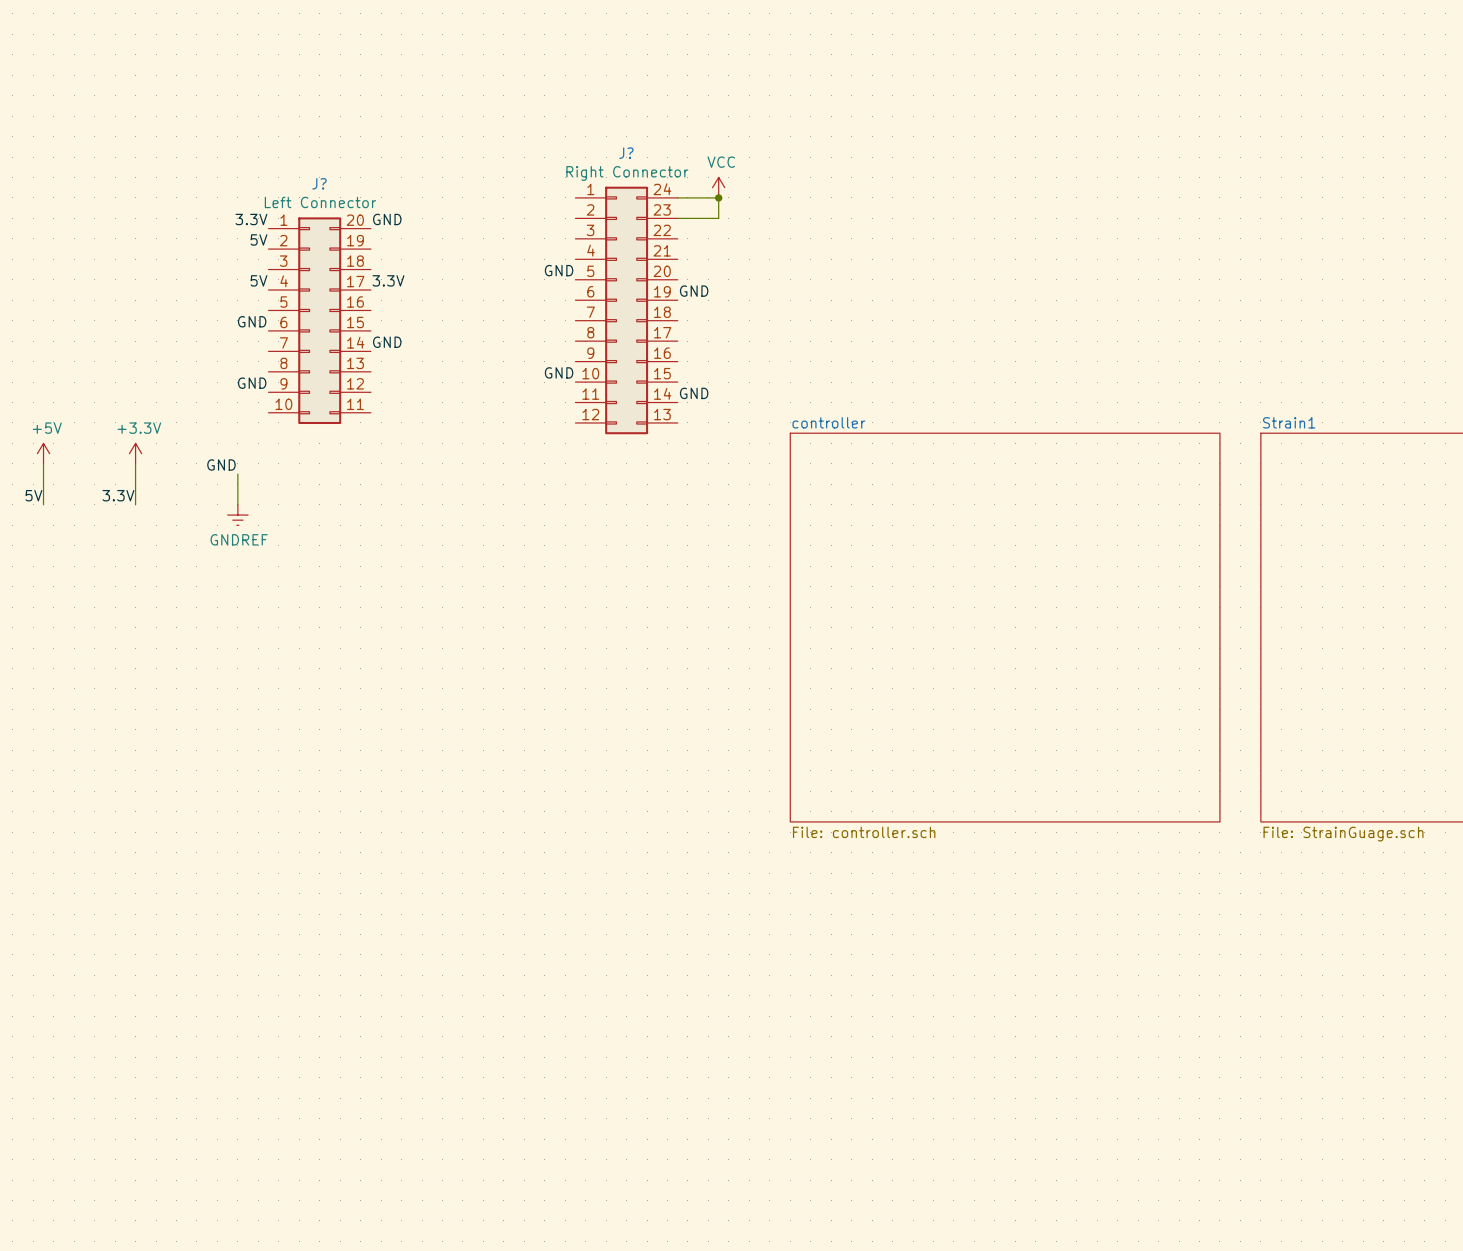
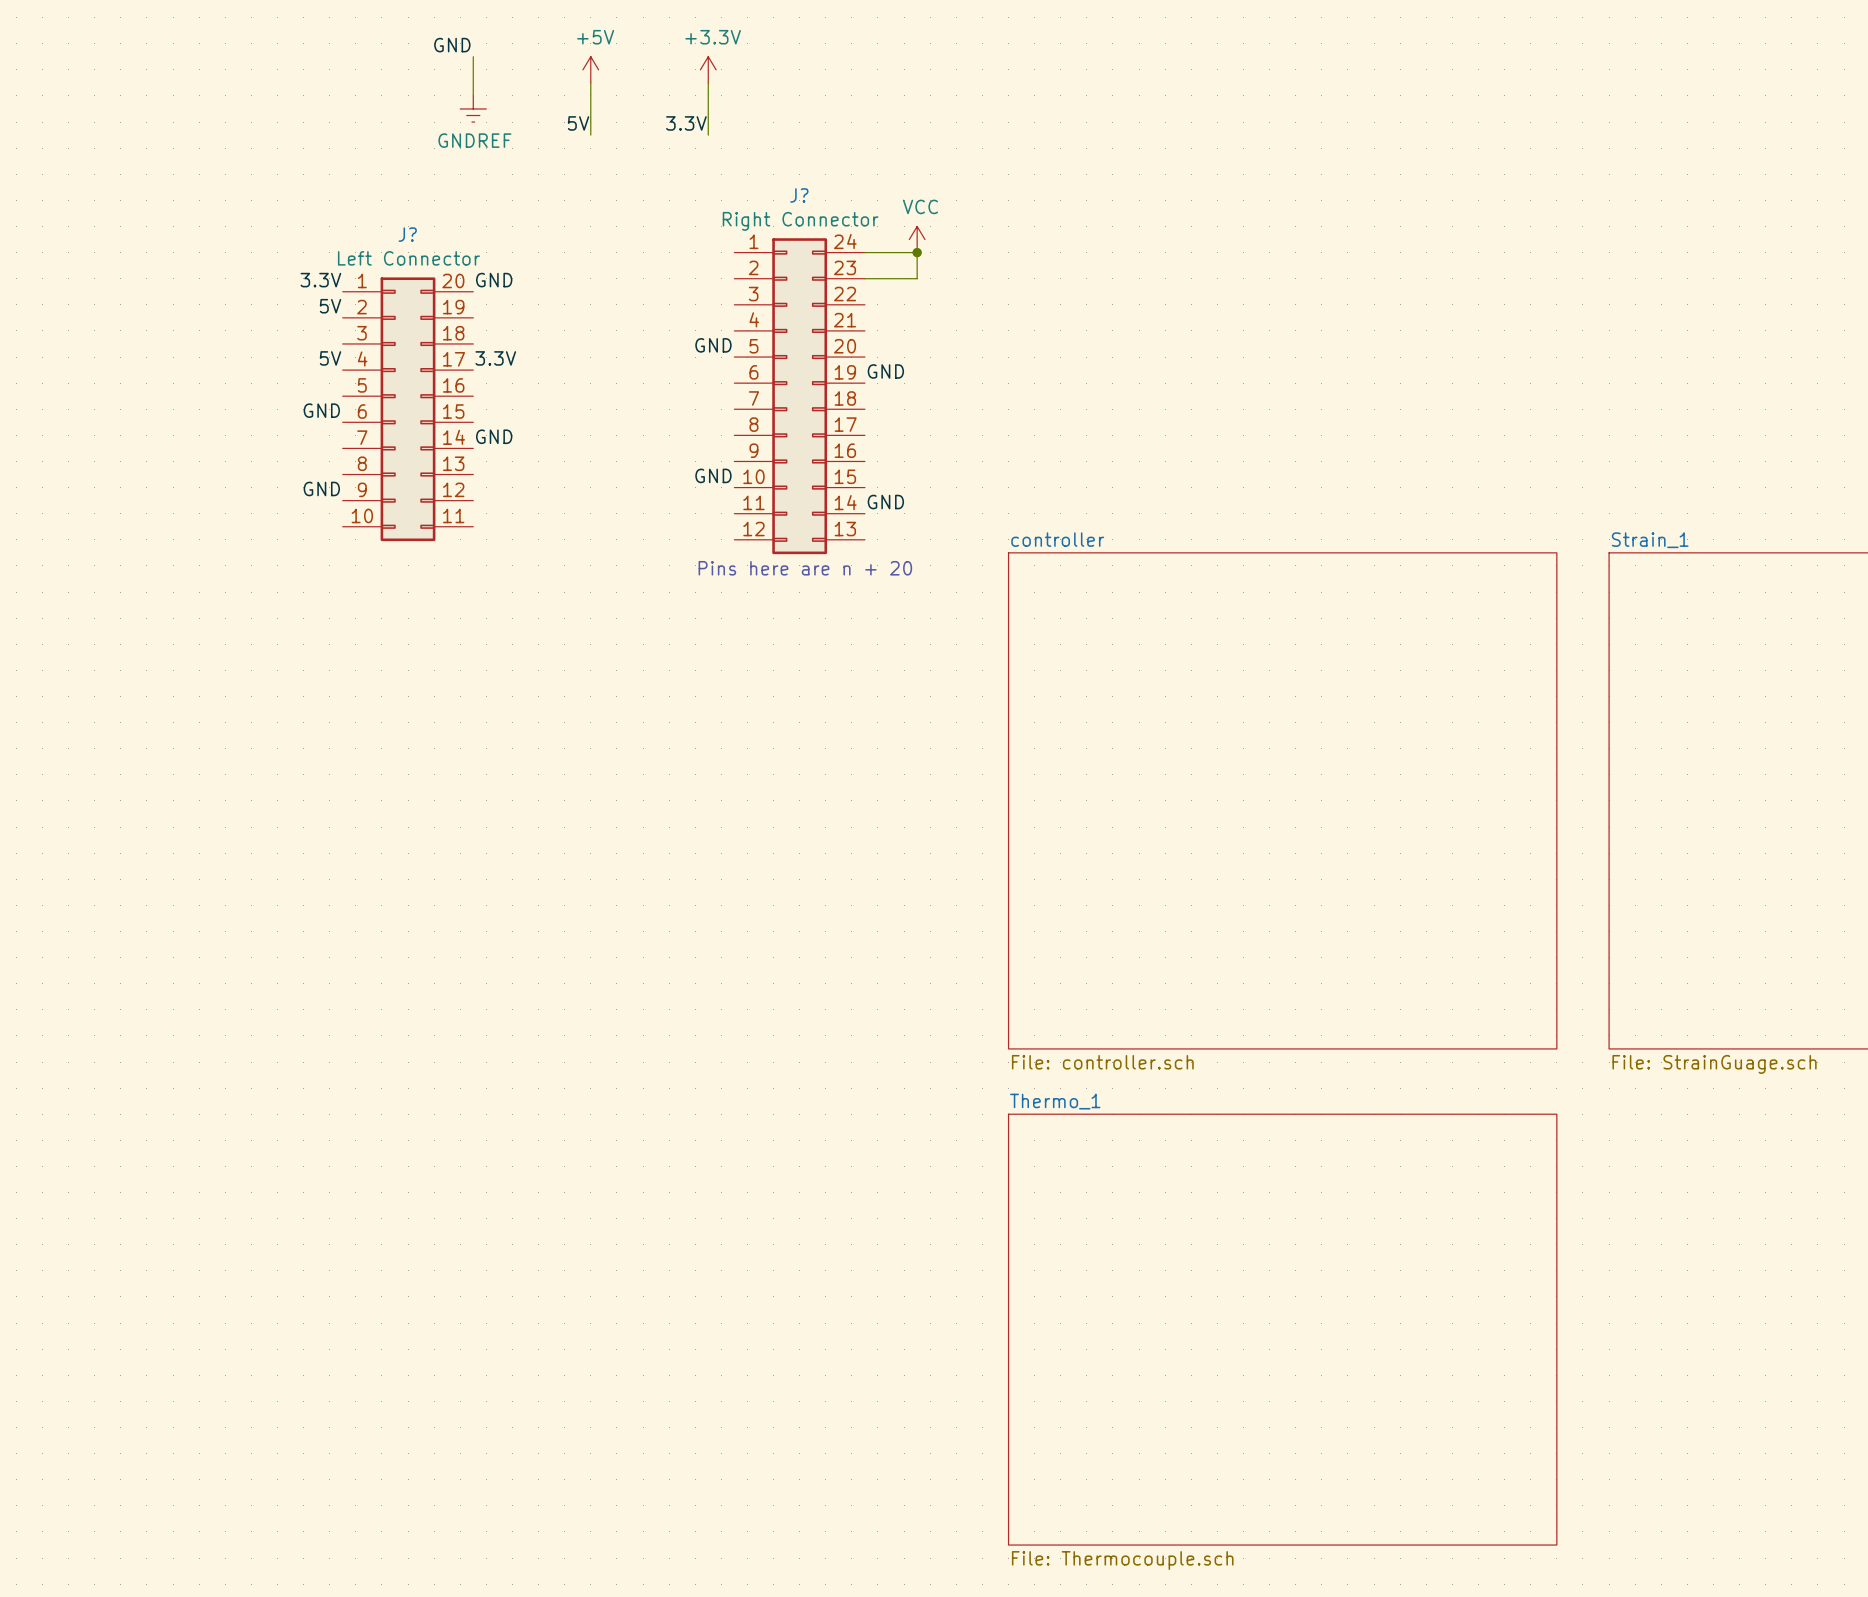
label: none -> GND (452, 45)
wire: none -> (473, 56) (473, 95)
power symbol: none -> +5V (590, 69)
power symbol: none -> +3.3V (708, 69)
wire: none -> (590, 82) (590, 135)
wire: none -> (708, 82) (708, 135)
power symbol: none -> GNDREF (473, 108)
label: none -> 5V (578, 123)
label: none -> 3.3V (686, 123)
sheet Strain1 name: Strain1 (1289, 422) -> Strain_1 (1650, 540)
text: none -> Pins here are n + 20 (805, 568)
power symbol: +5V (43, 453) -> none
power symbol: +3.3V (135, 453) -> none
wire: (43, 463) (43, 504) -> none
wire: (135, 463) (135, 504) -> none
label: GND (221, 465) -> none
wire: (237, 474) (237, 504) -> none
label: 5V (33, 495) -> none
label: 3.3V (118, 495) -> none
power symbol: GNDREF (237, 515) -> none
sheet Thermo_1: none -> File: Thermocouple.sch (1282, 1329)

